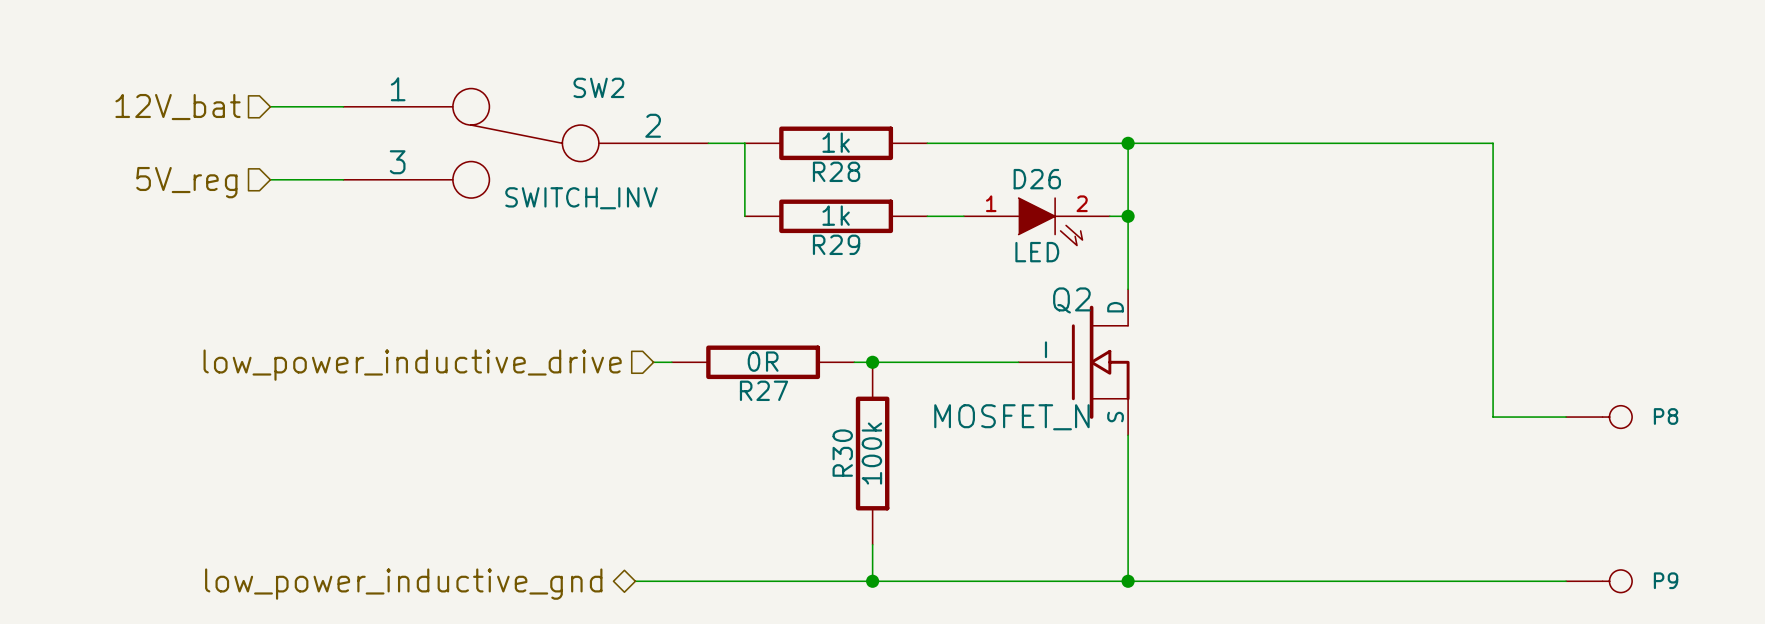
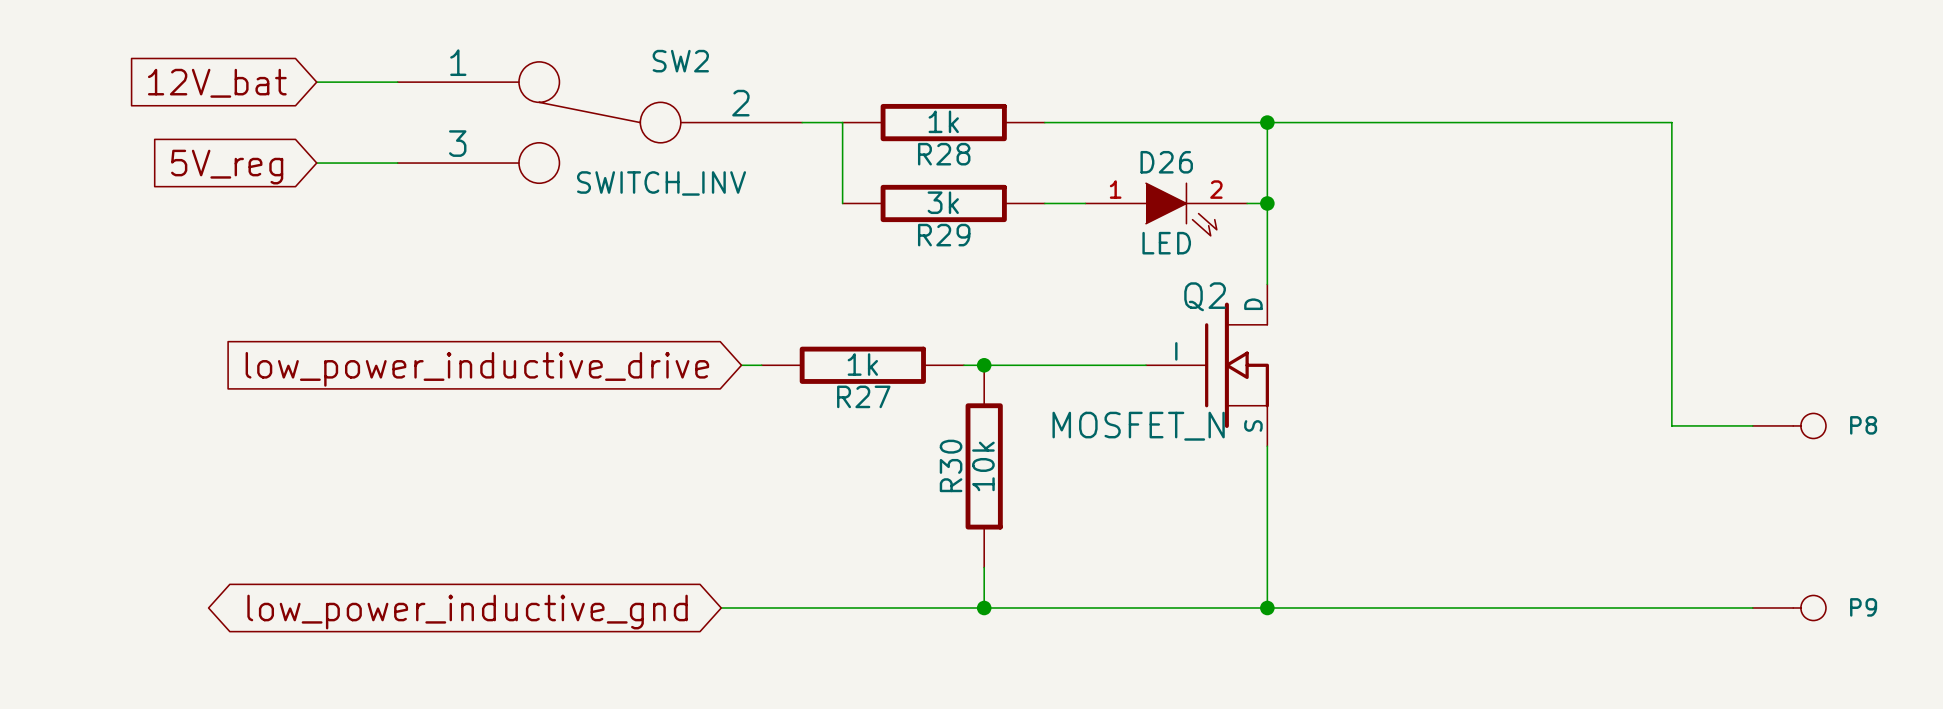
hierarchical label: 12V_bat (178, 107) -> none
global label: none -> 12V_bat (217, 83)
hierarchical label: 5V_reg (186, 182) -> none
global label: none -> 5V_reg (227, 167)
R29 value: 1k (836, 215) -> 3k (943, 202)
R27 value: 0R (763, 361) -> 1k (862, 364)
hierarchical label: low_power_inductive_drive (412, 365) -> none
global label: none -> low_power_inductive_drive (477, 369)
R30 value: 100k (871, 453) -> 10k (983, 466)
hierarchical label: low_power_inductive_gnd (403, 584) -> none
global label: none -> low_power_inductive_gnd (467, 612)

